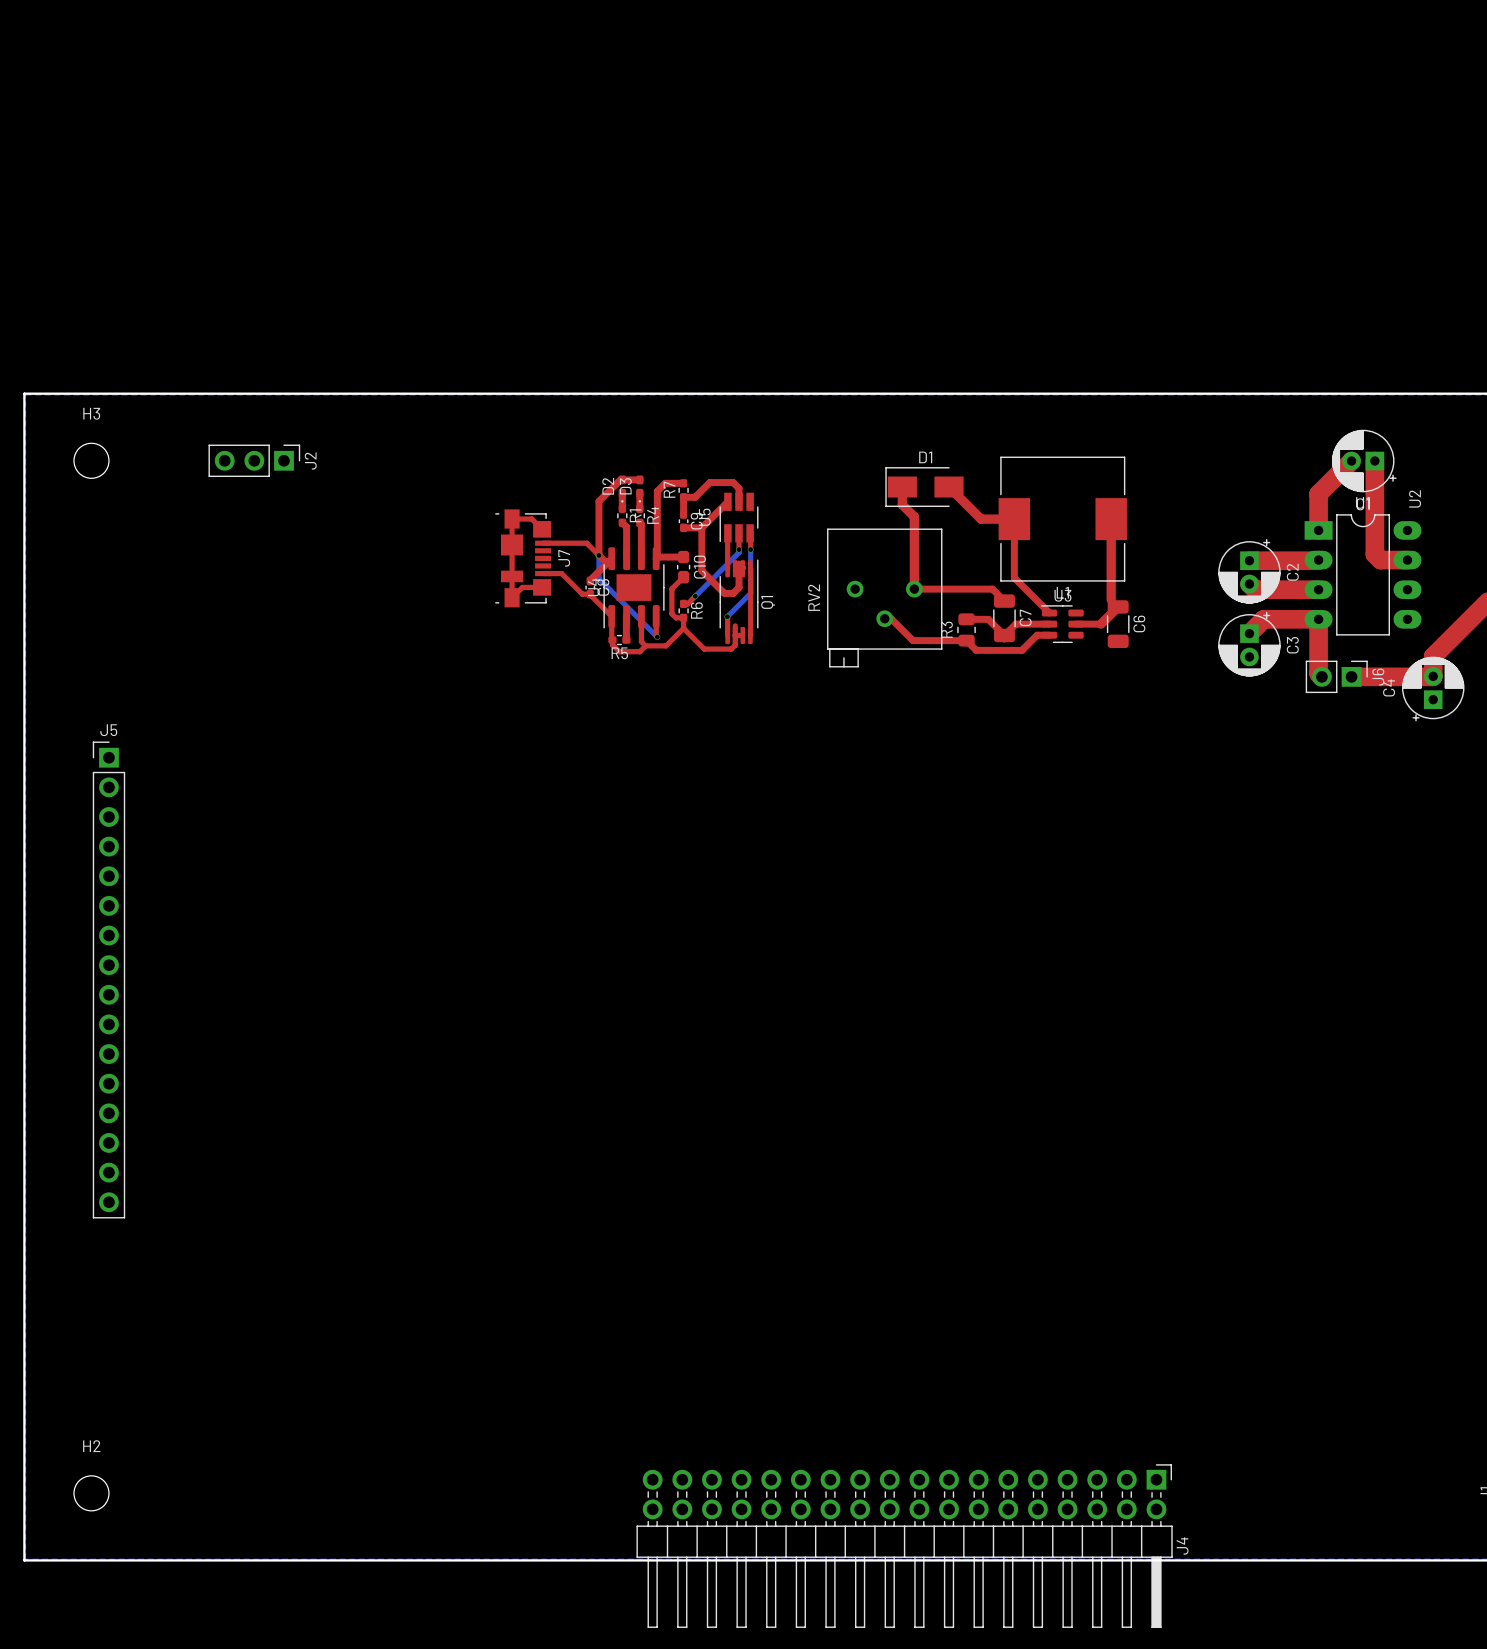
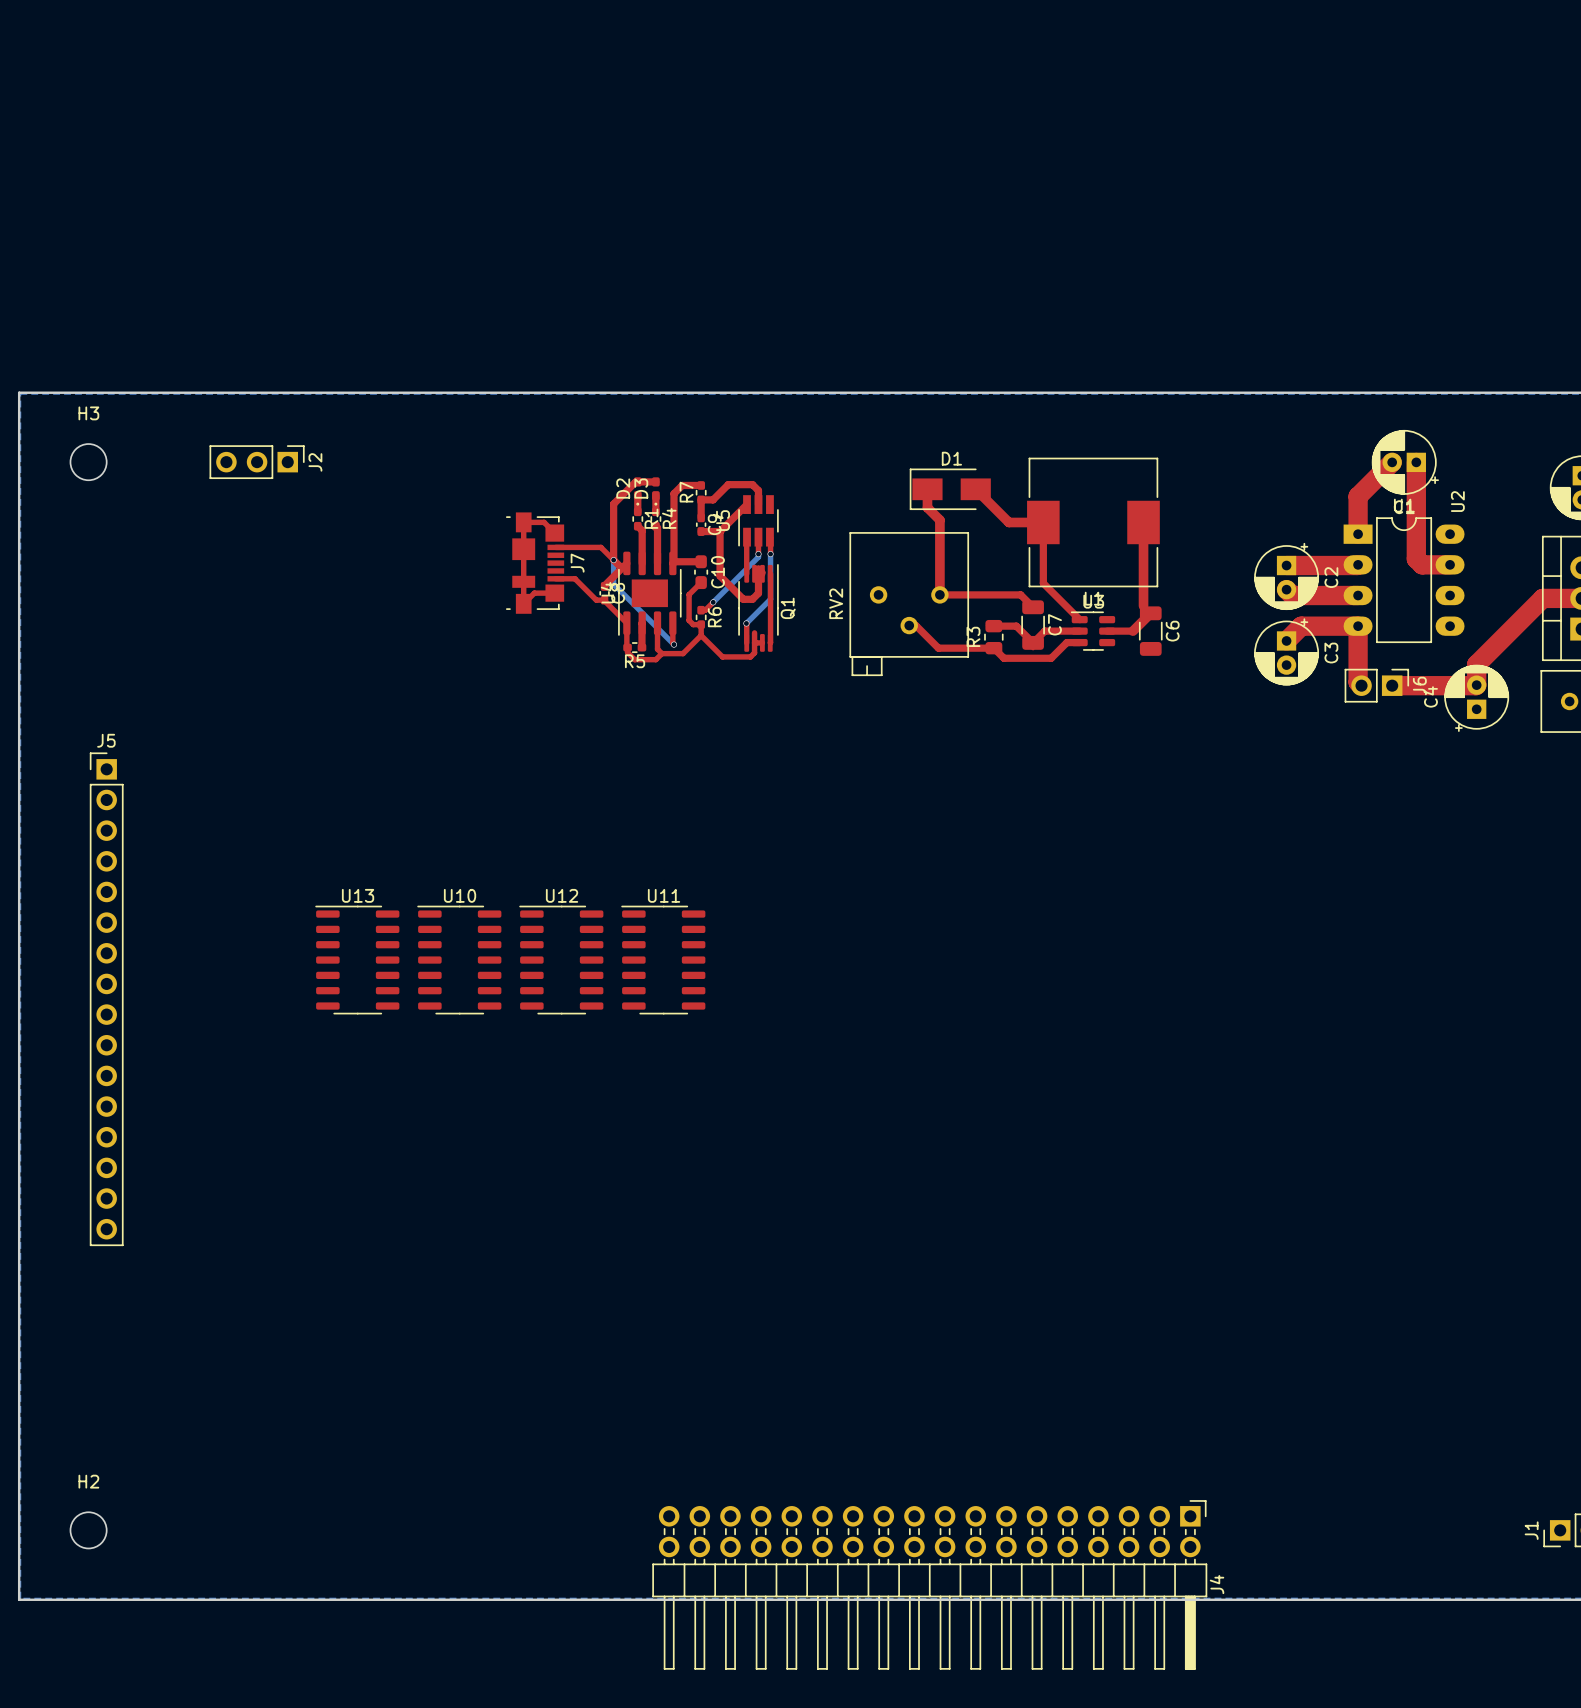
U13: none -> (357, 960)
U10: none -> (459, 960)
U12: none -> (561, 960)
U11: none -> (663, 960)

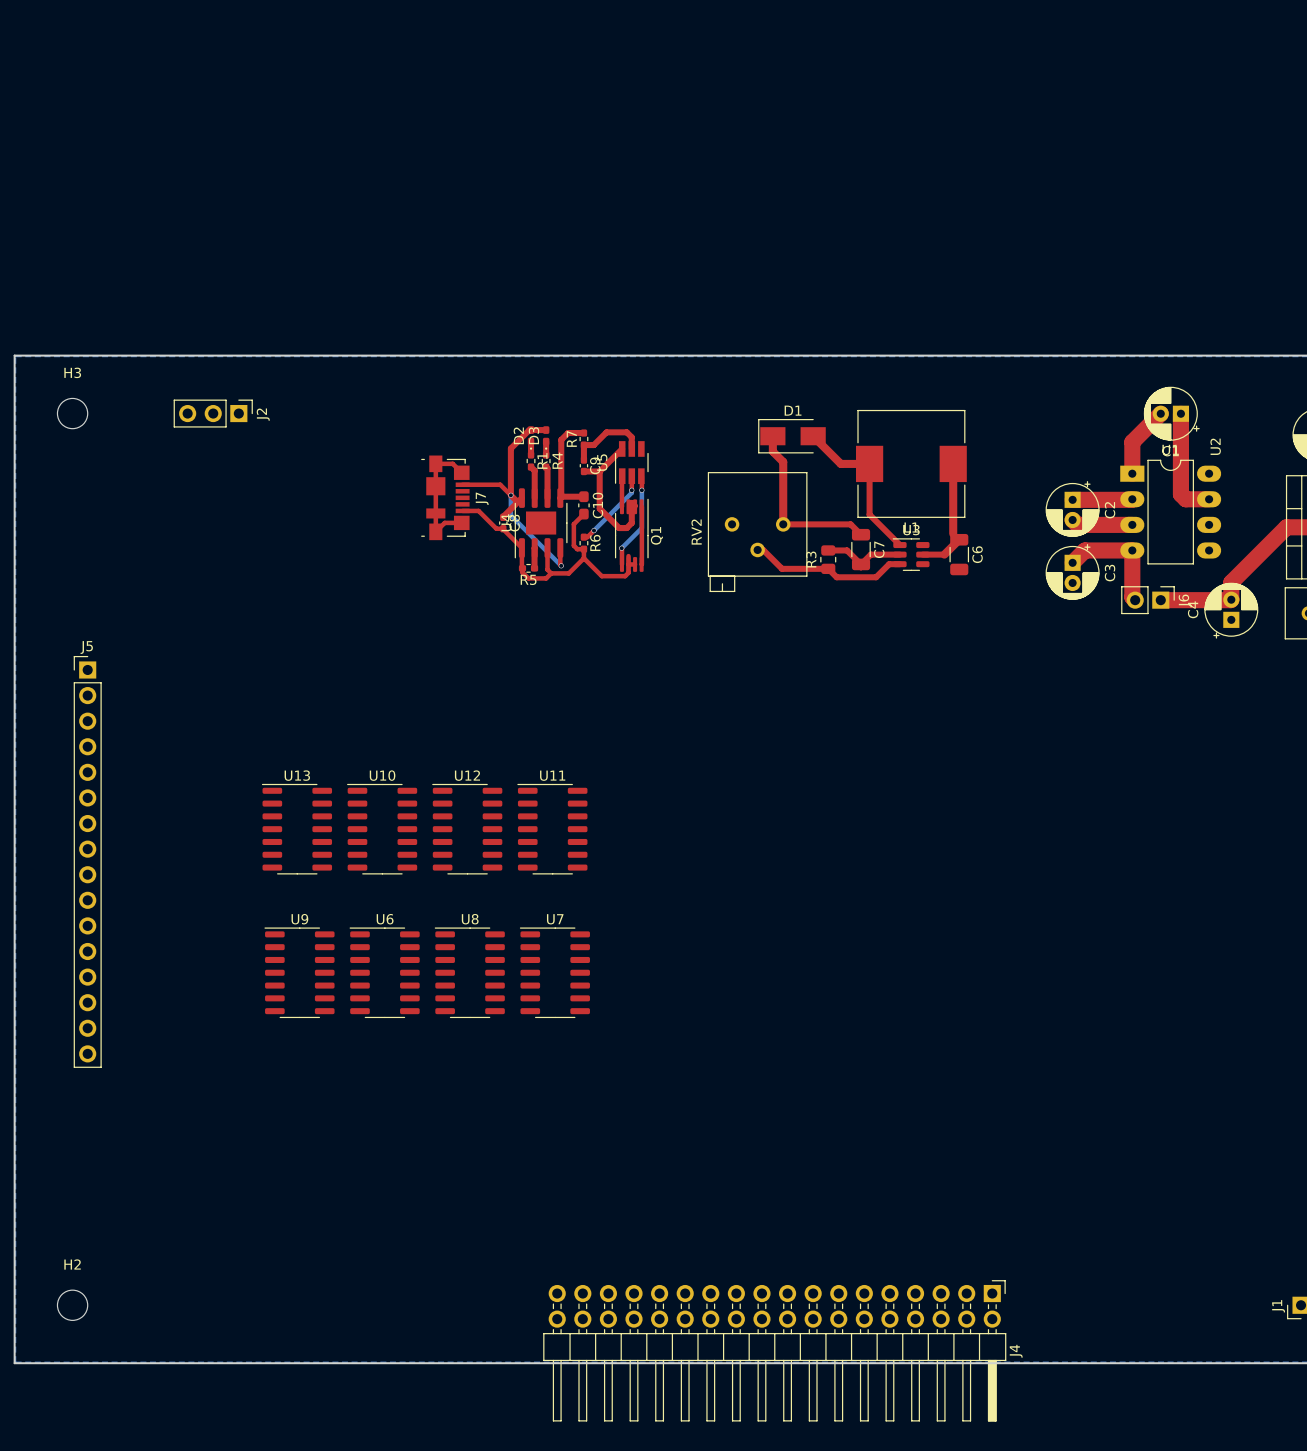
U9: none -> (299, 972)
U6: none -> (384, 972)
U8: none -> (469, 972)
U7: none -> (554, 972)

